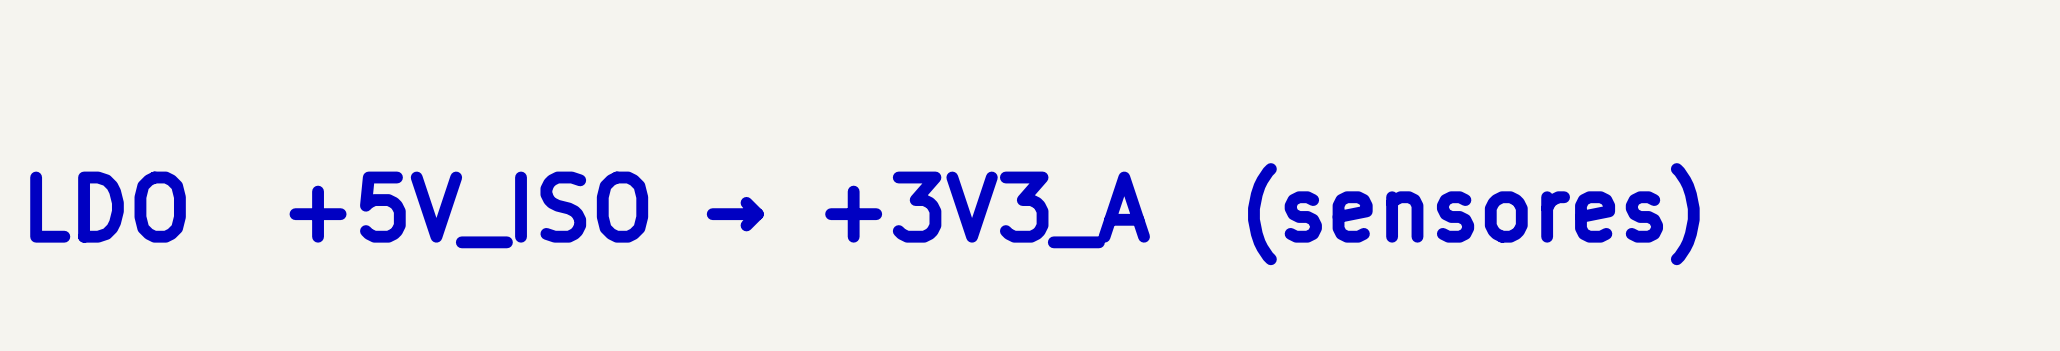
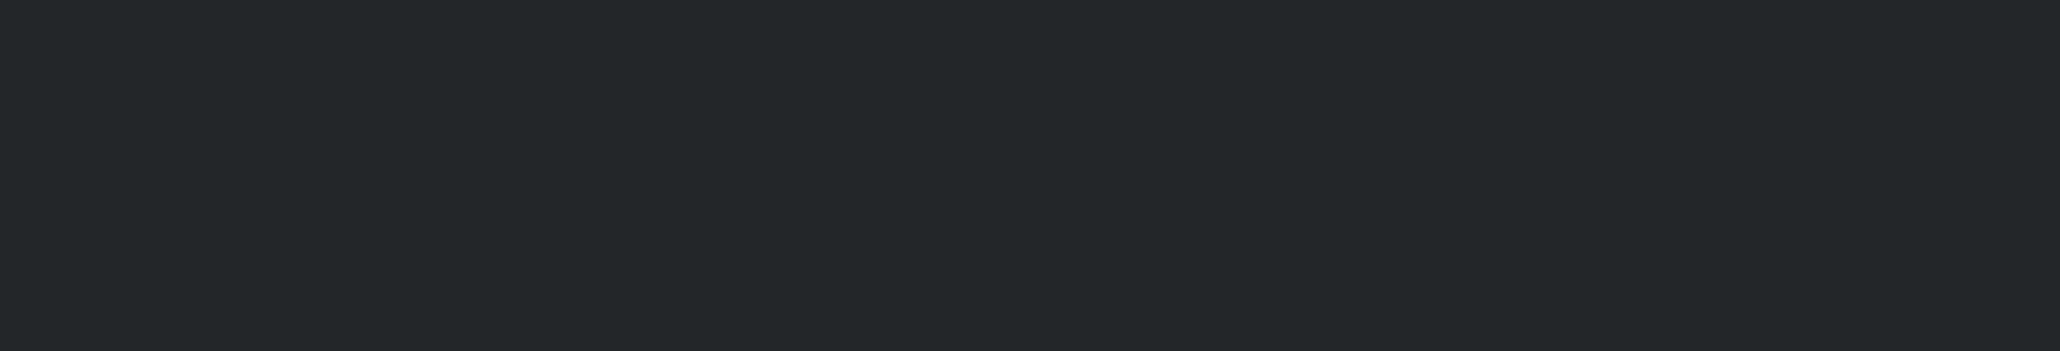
text: LDO +5V_ISO → +3V3_A (sensores) (864, 214) -> none

